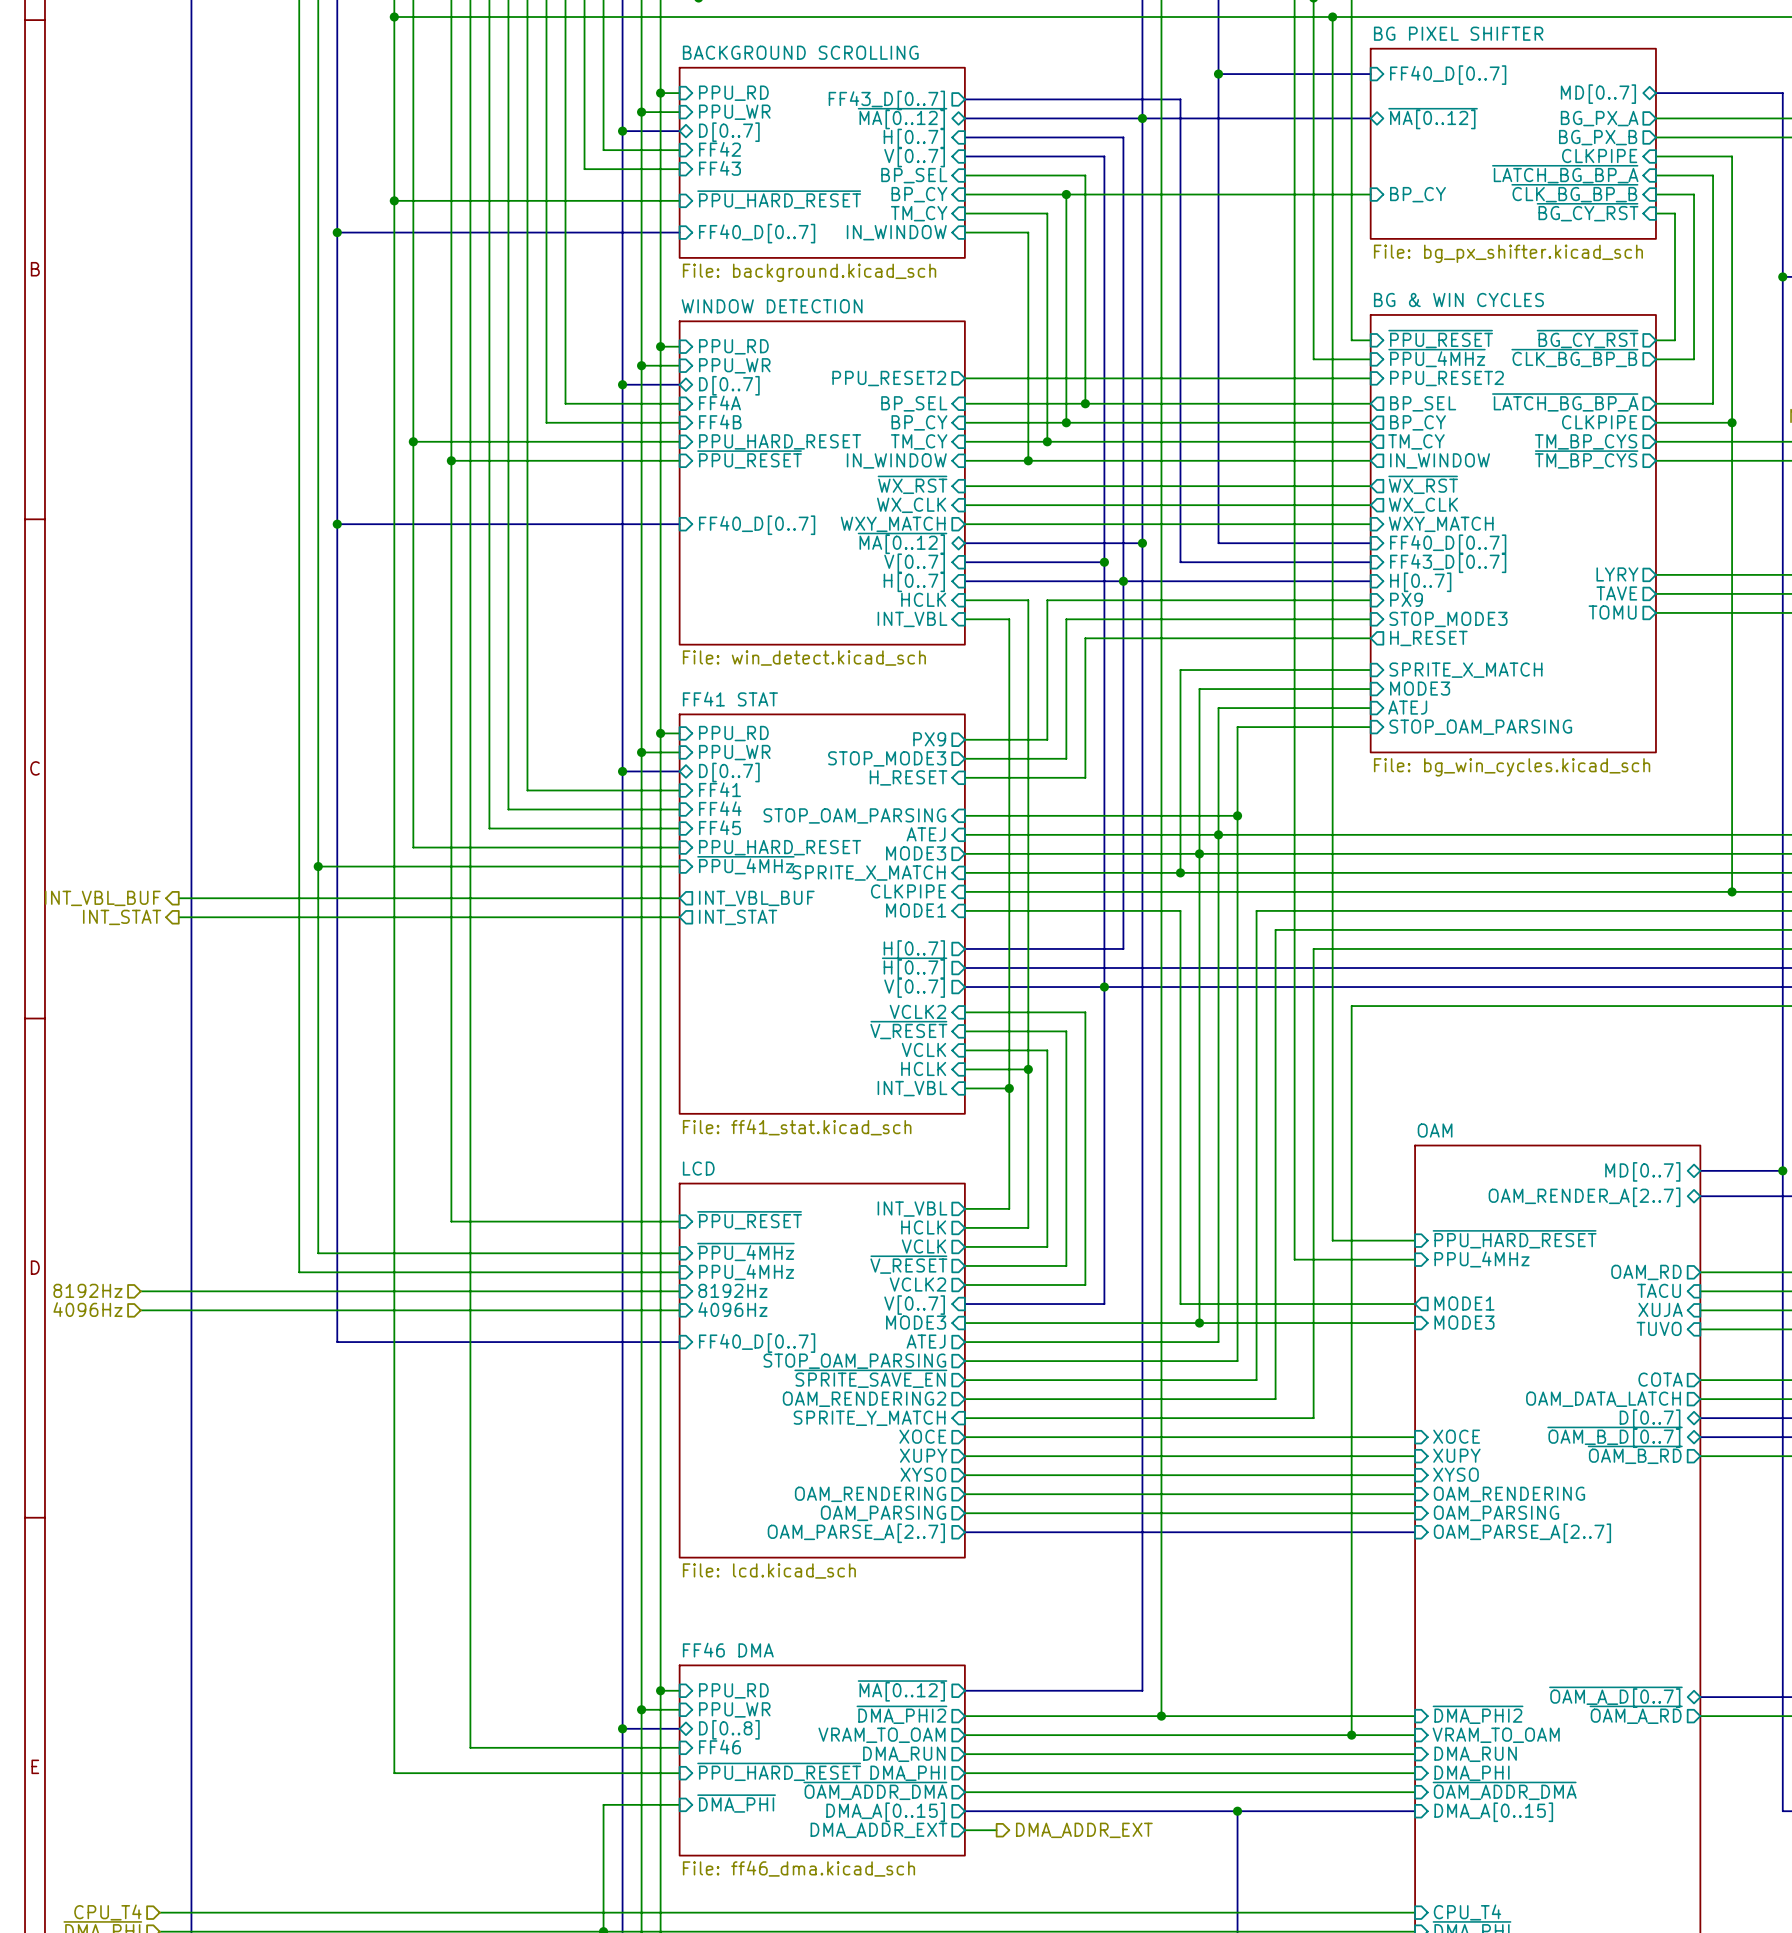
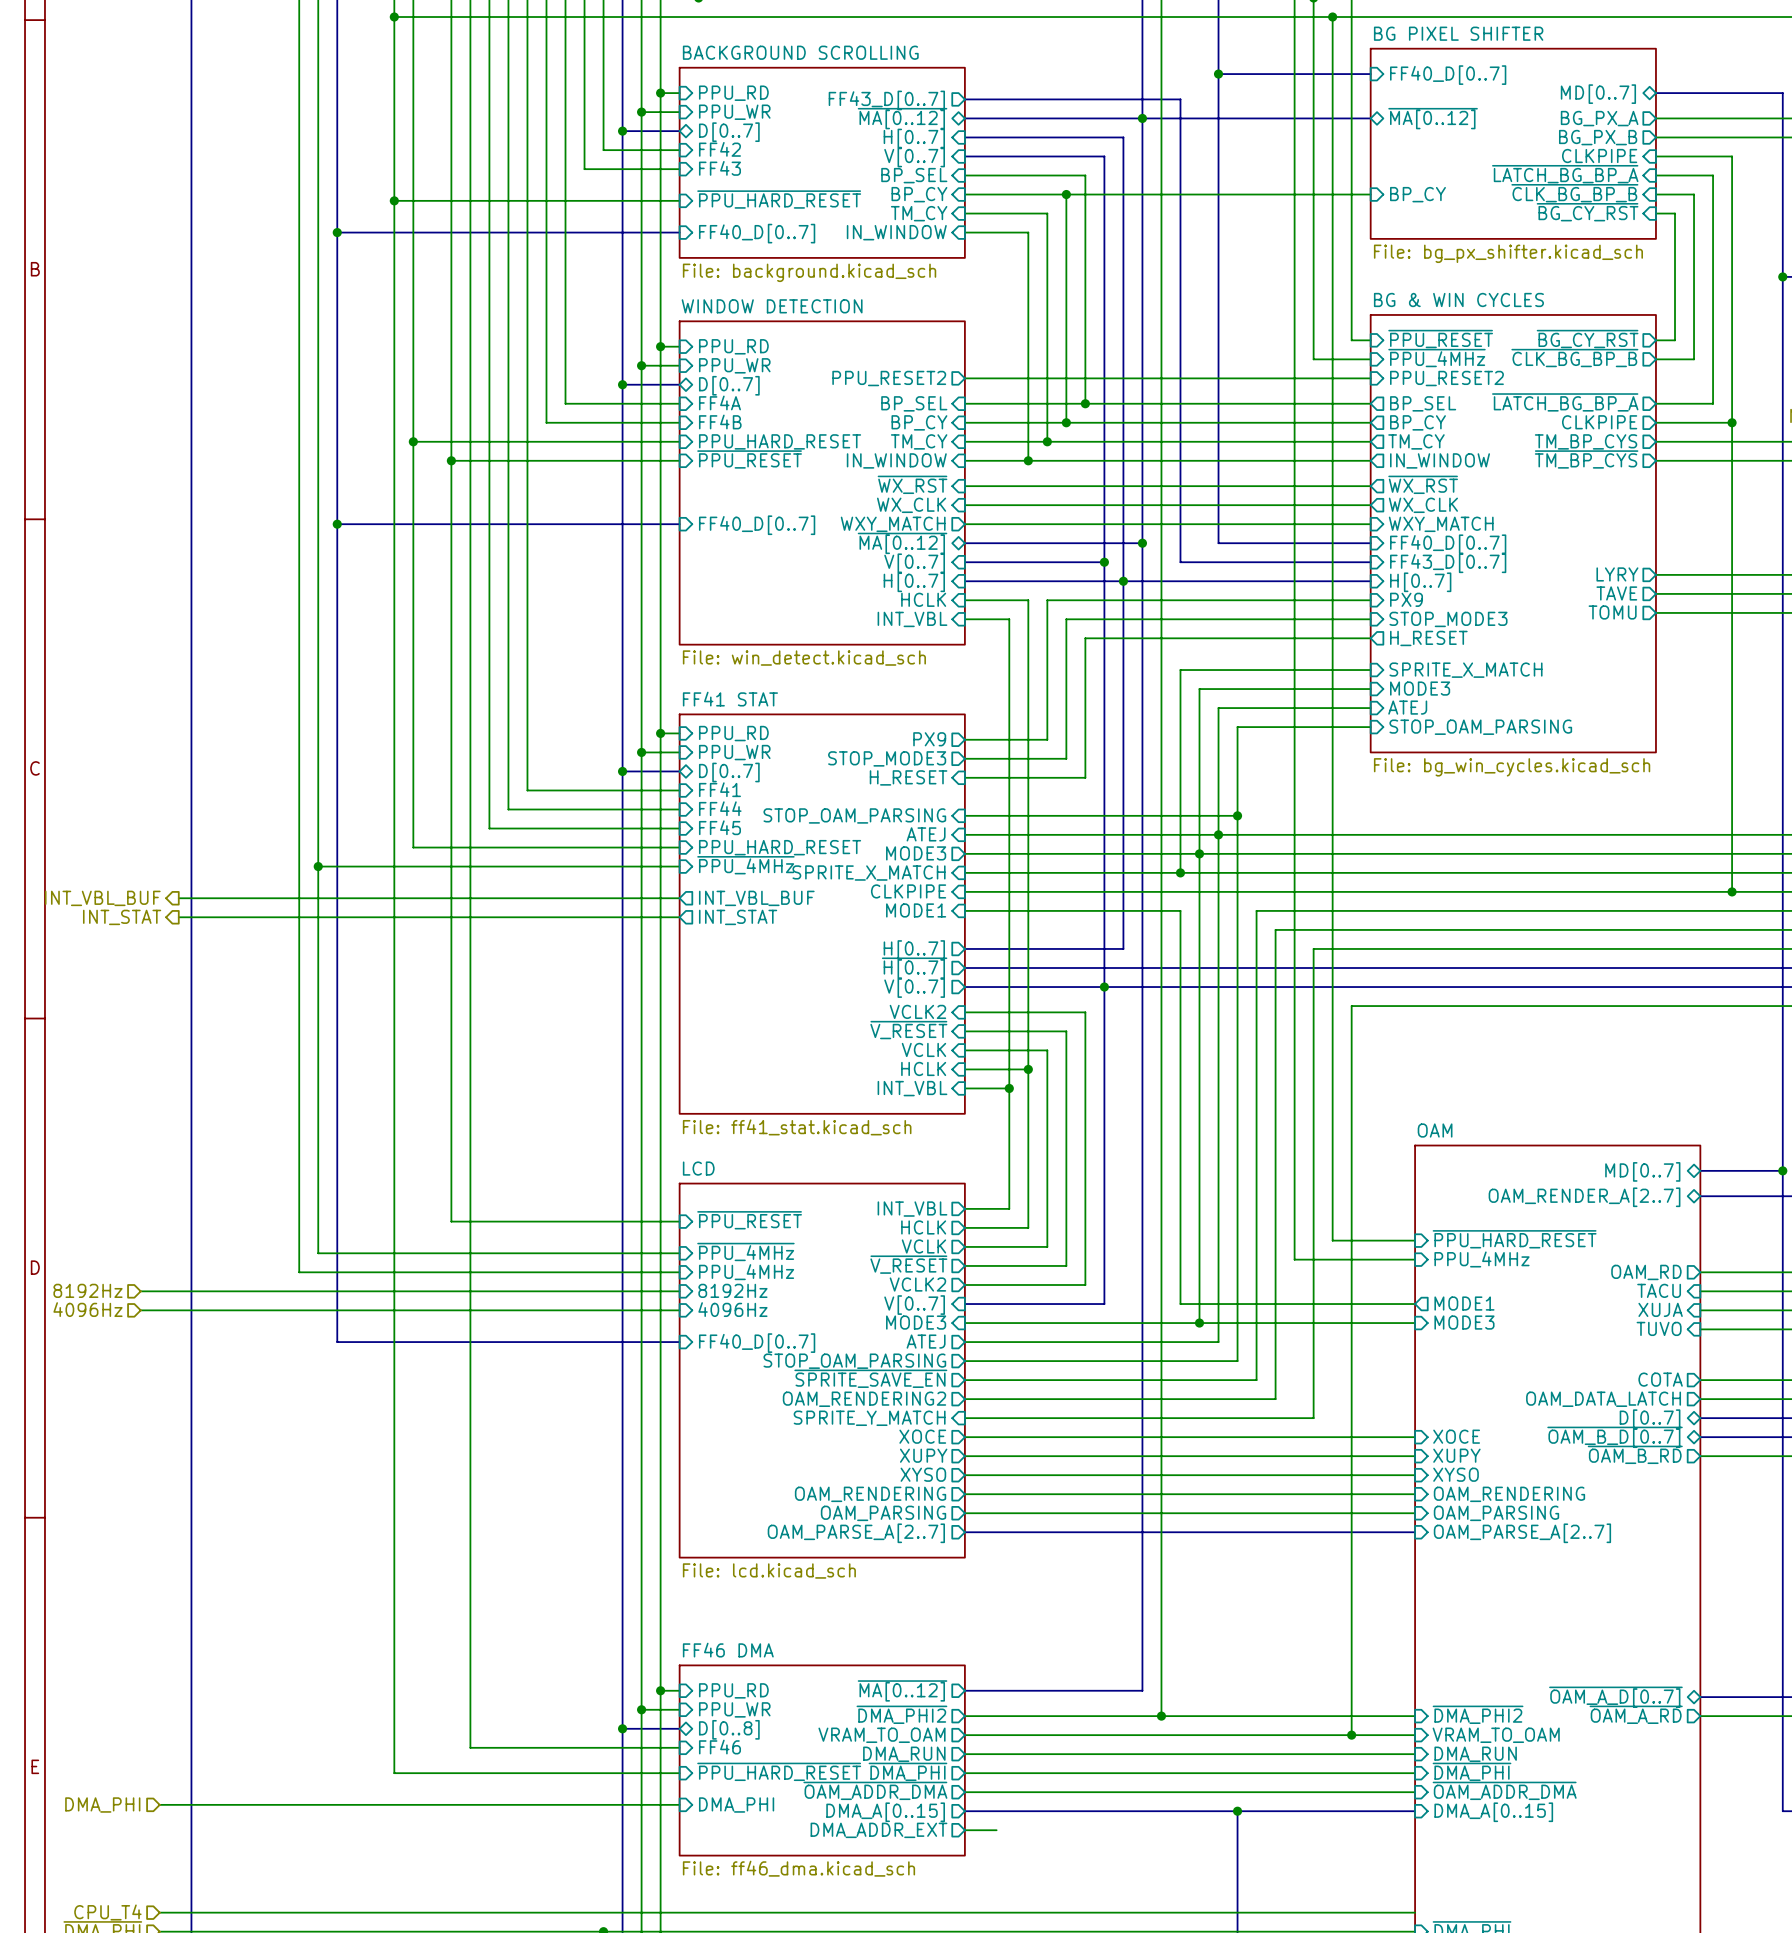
sheet pin: DMA_PHI (907, 1773) -> ~{DMA_PHI} (907, 1771)
sheet pin: DMA_PHI (1472, 1773) -> ~{DMA_PHI} (1472, 1771)
sheet pin: ~{DMA_PHI} (736, 1803) -> DMA_PHI (736, 1805)
wire: (603, 1804) (603, 1931) -> (603, 1804) (159, 1804)
hierarchical label: none -> DMA_PHI (102, 1805)
hierarchical label: DMA_ADDR_EXT (1084, 1830) -> none
sheet pin: CPU_T4 (1467, 1912) -> none

